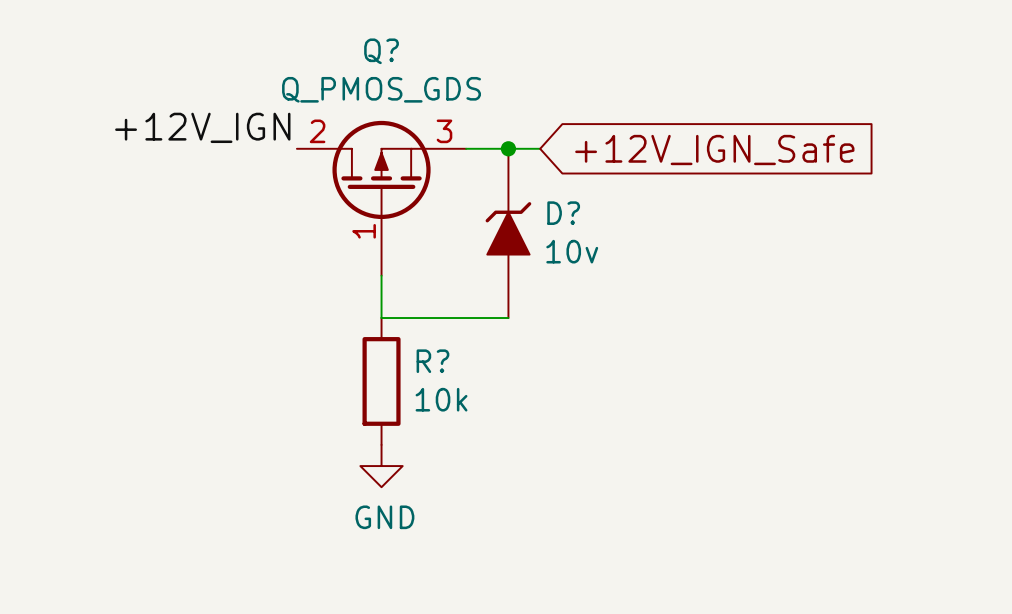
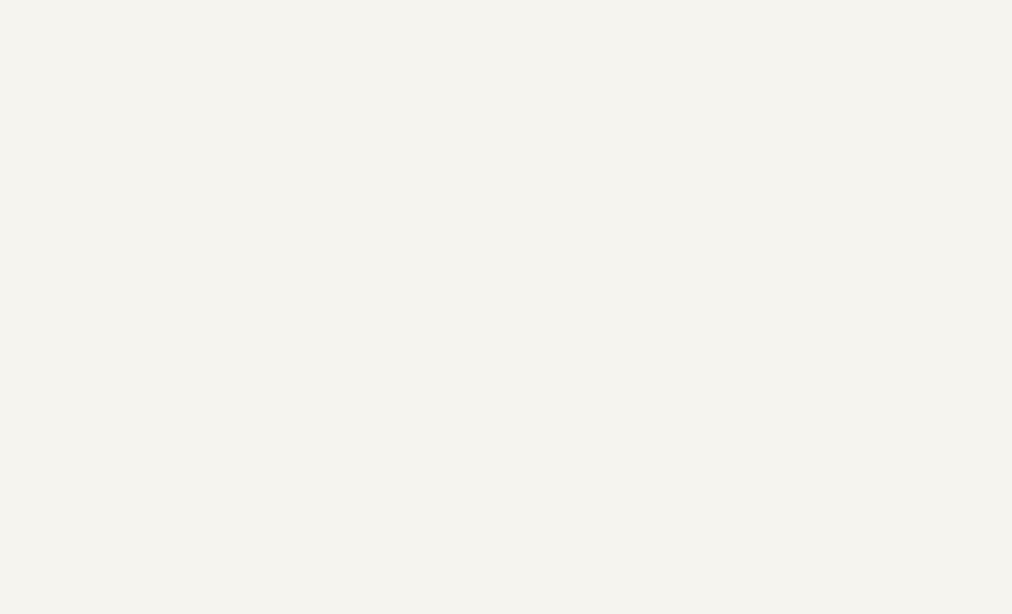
label: +12V_IGN (202, 127) -> none
wire: (466, 148) (540, 148) -> none
junction: (508, 148) -> none
global label: +12V_IGN_Safe (714, 150) -> none
Q?: Q_PMOS_GDS (381, 198) -> none
D?: 10v (508, 233) -> none
wire: (381, 275) (381, 318) (508, 318) -> none
R?: 10k (381, 381) -> none
power symbol: GND (381, 466) -> none

